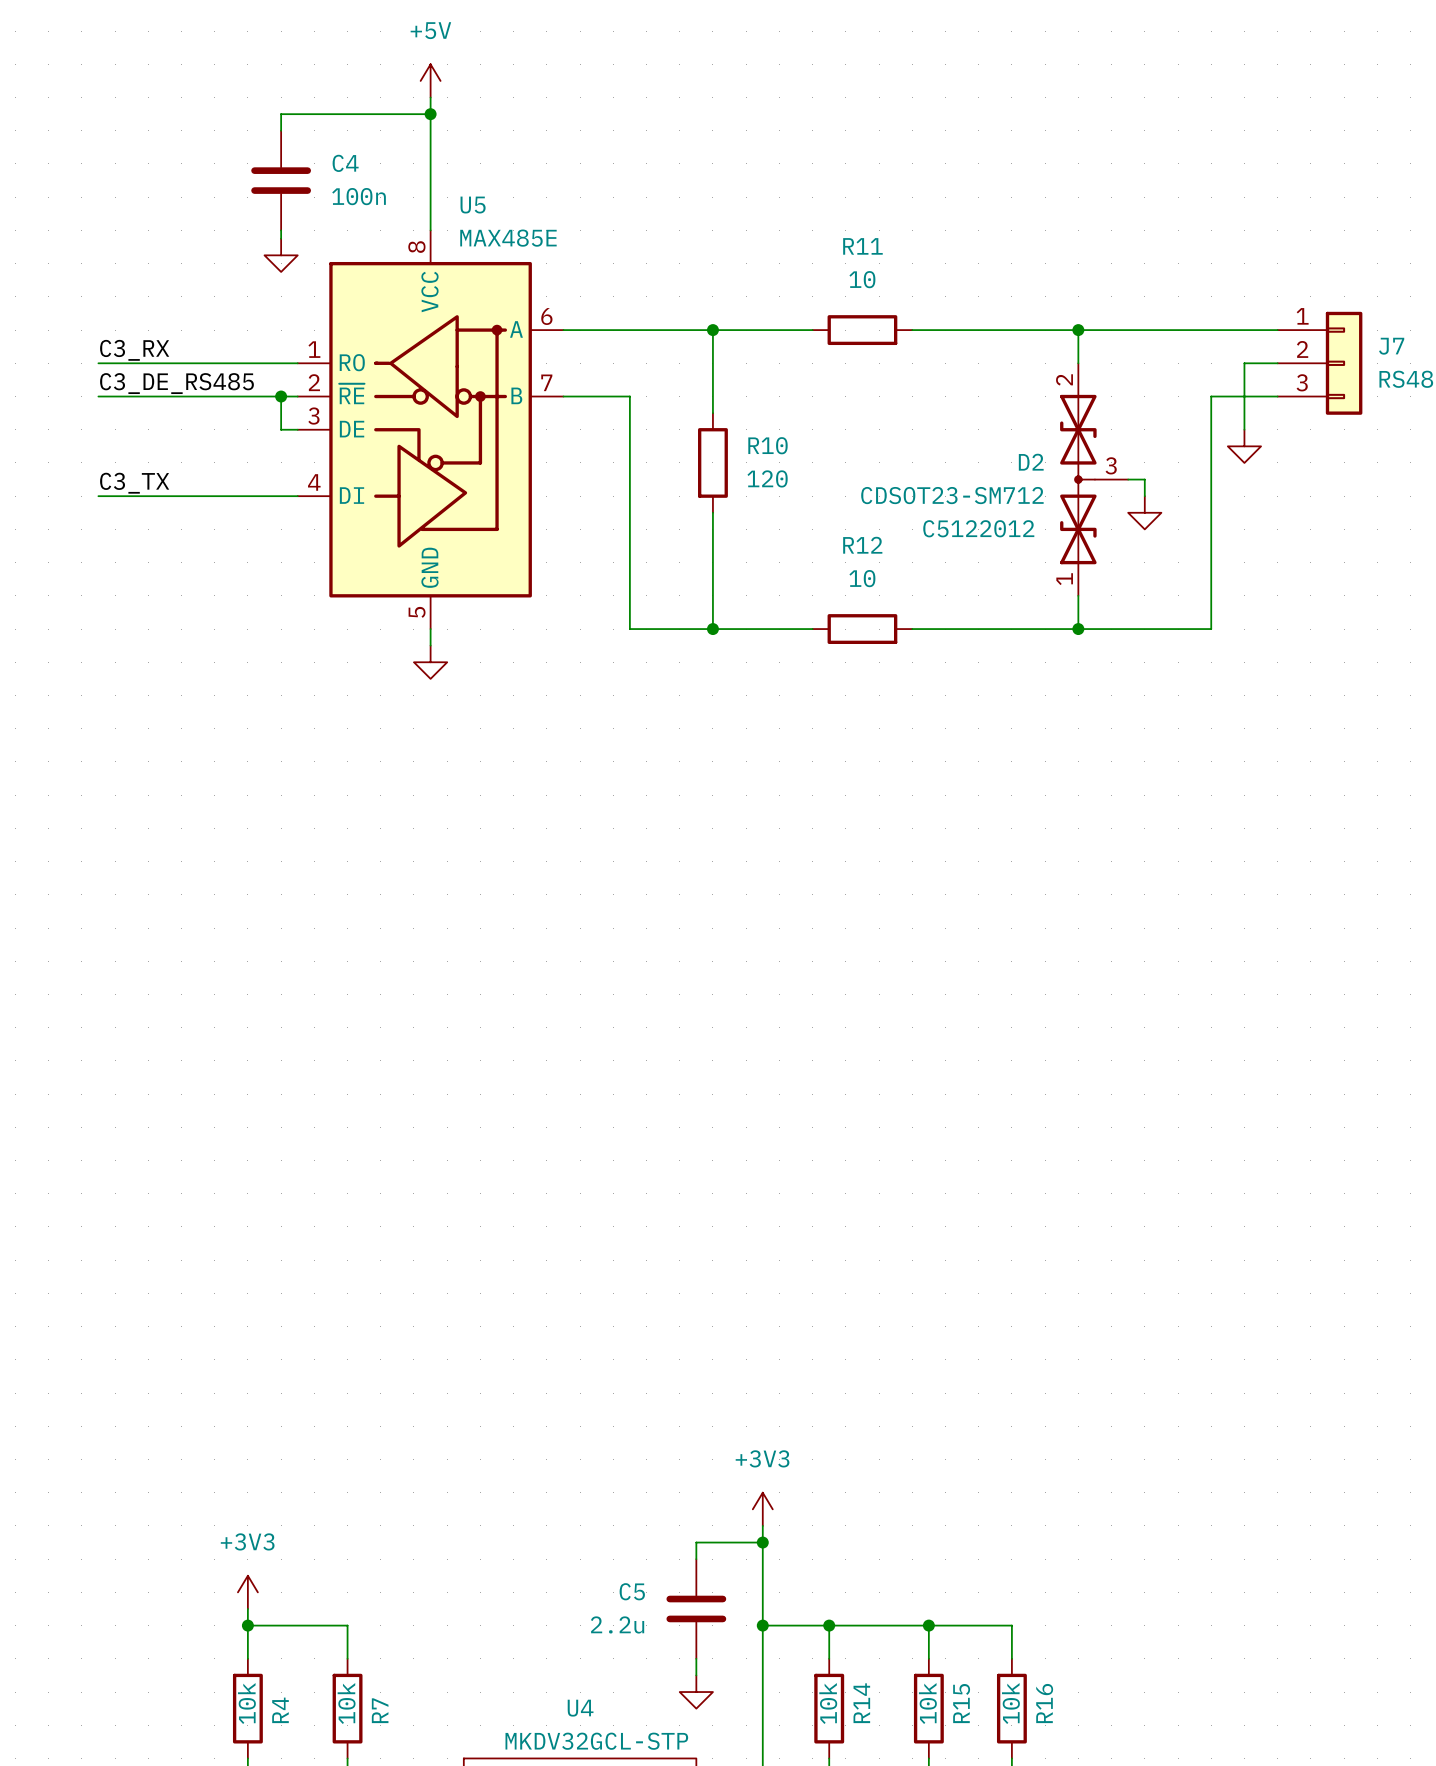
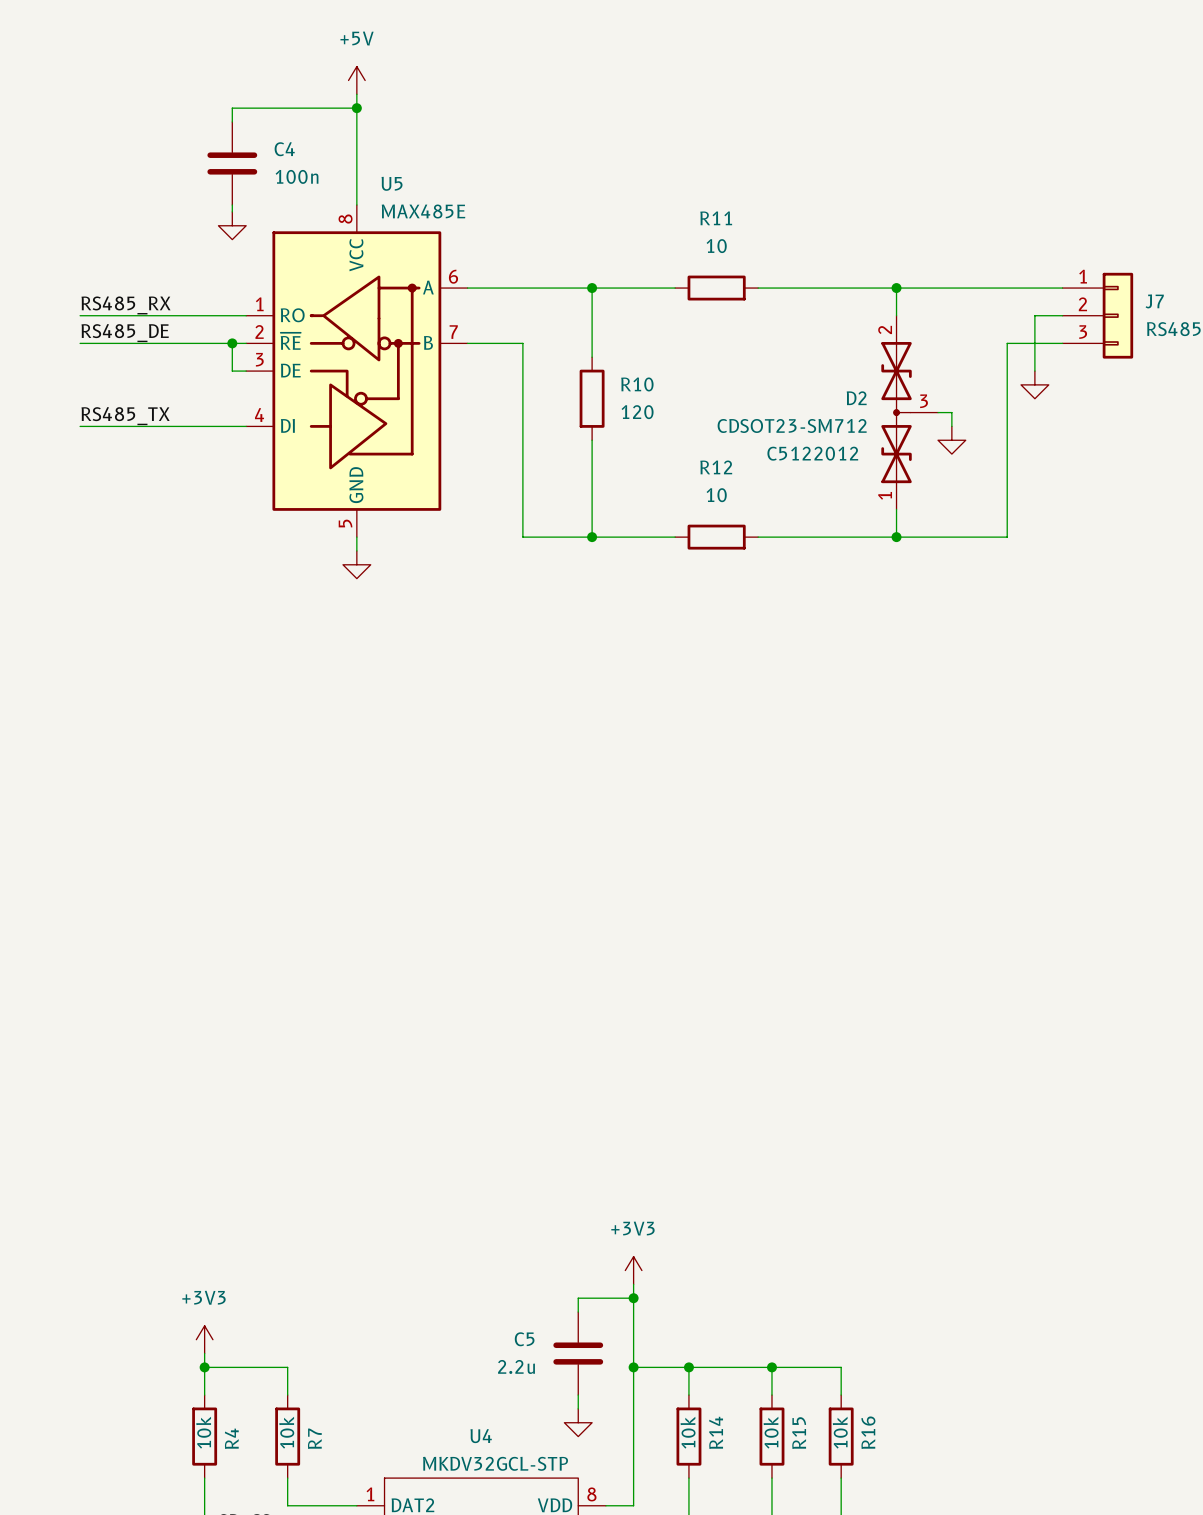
label: C3_RX (134, 350) -> RS485_RX (126, 305)
label: C3_DE_RS485 (176, 383) -> RS485_DE (125, 333)
label: C3_TX (134, 483) -> RS485_TX (125, 416)

